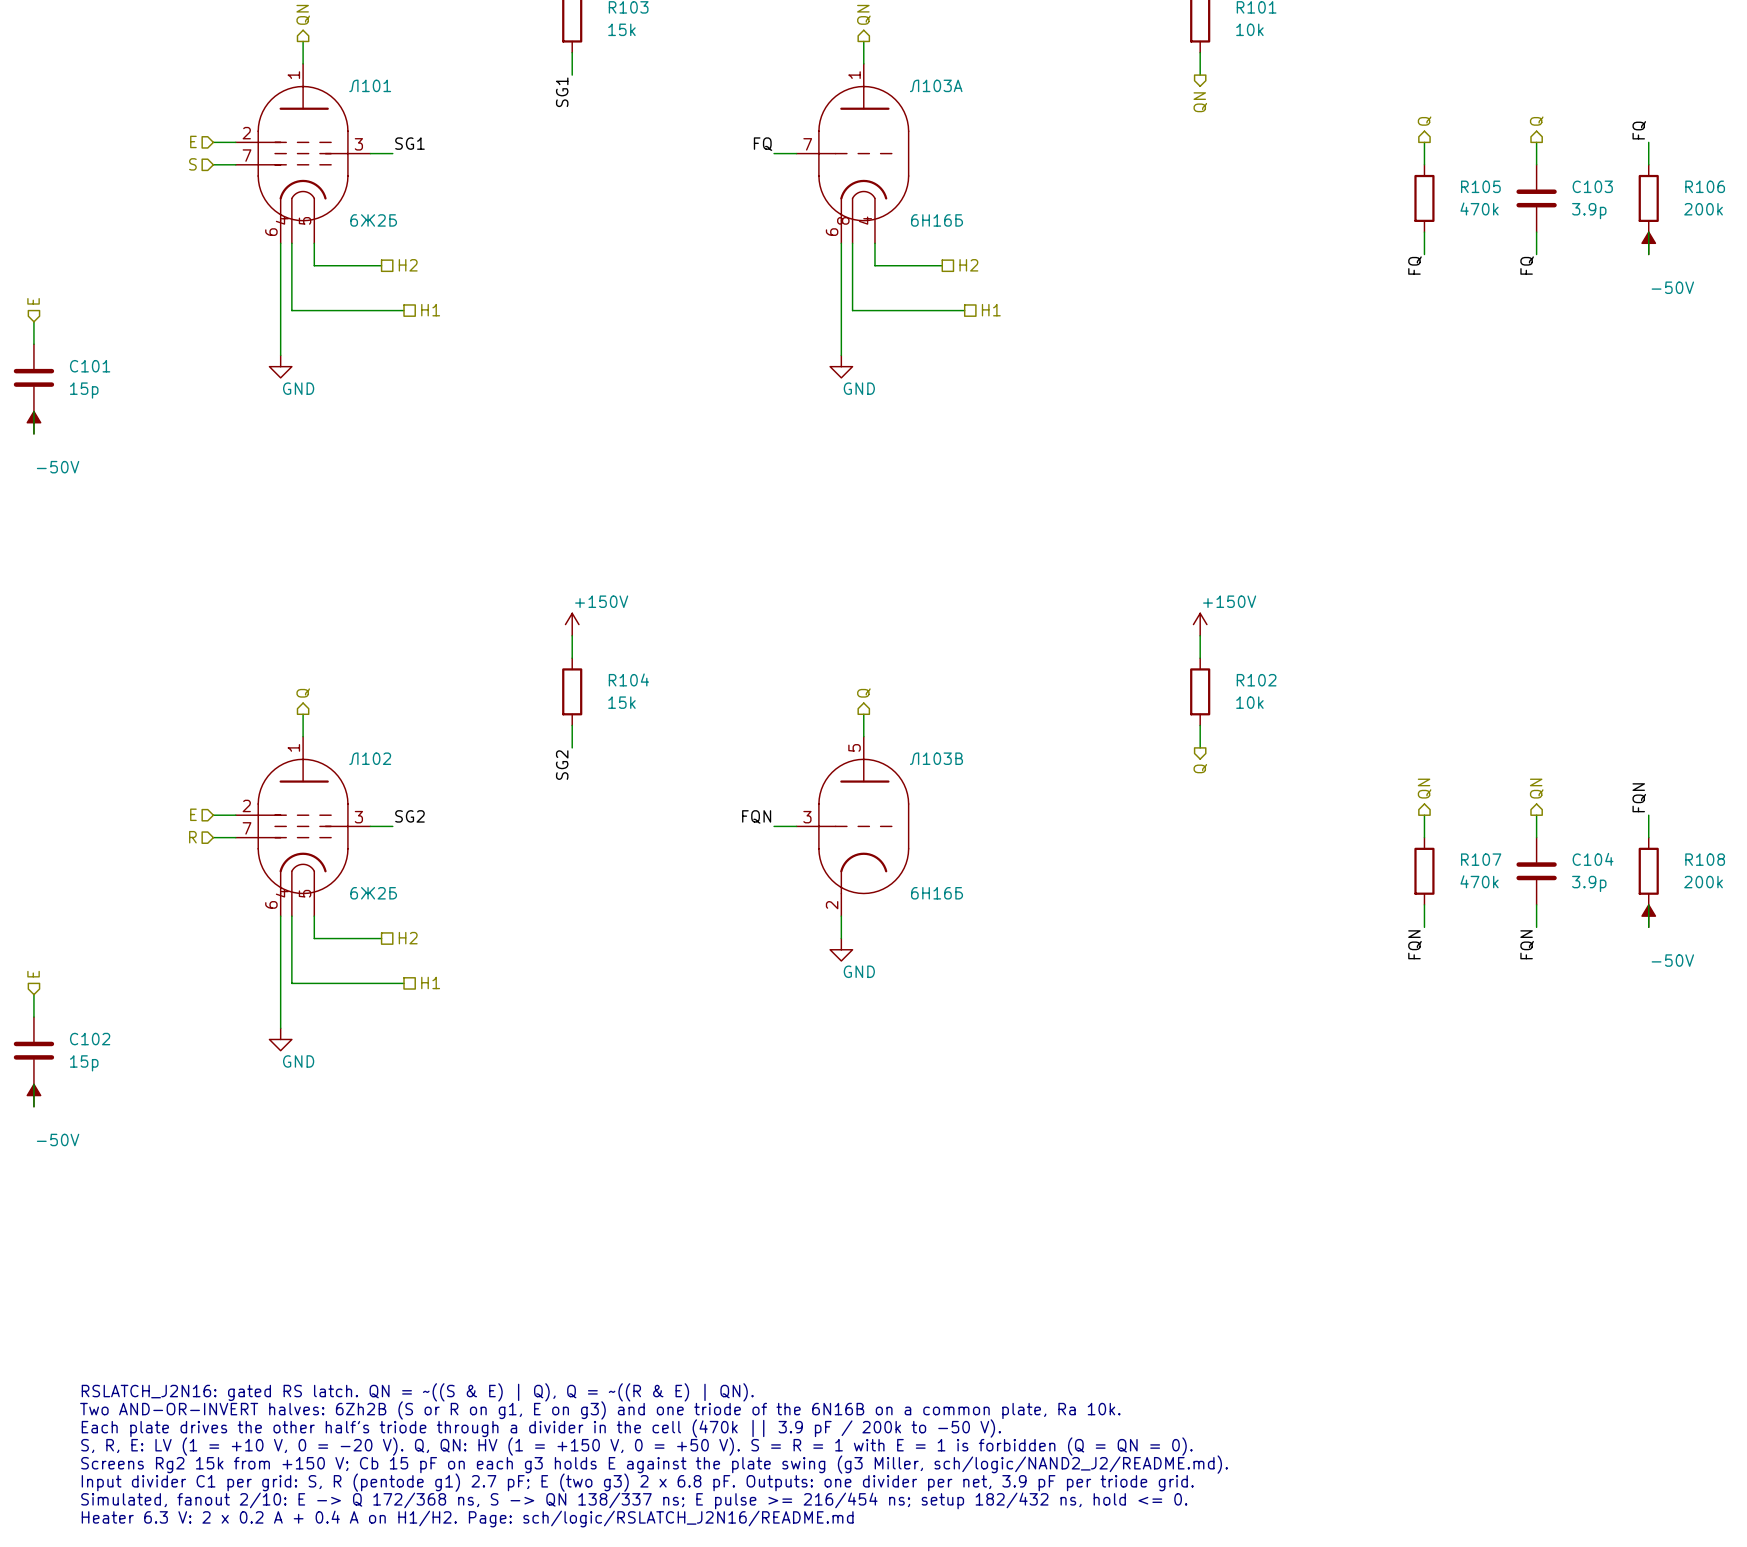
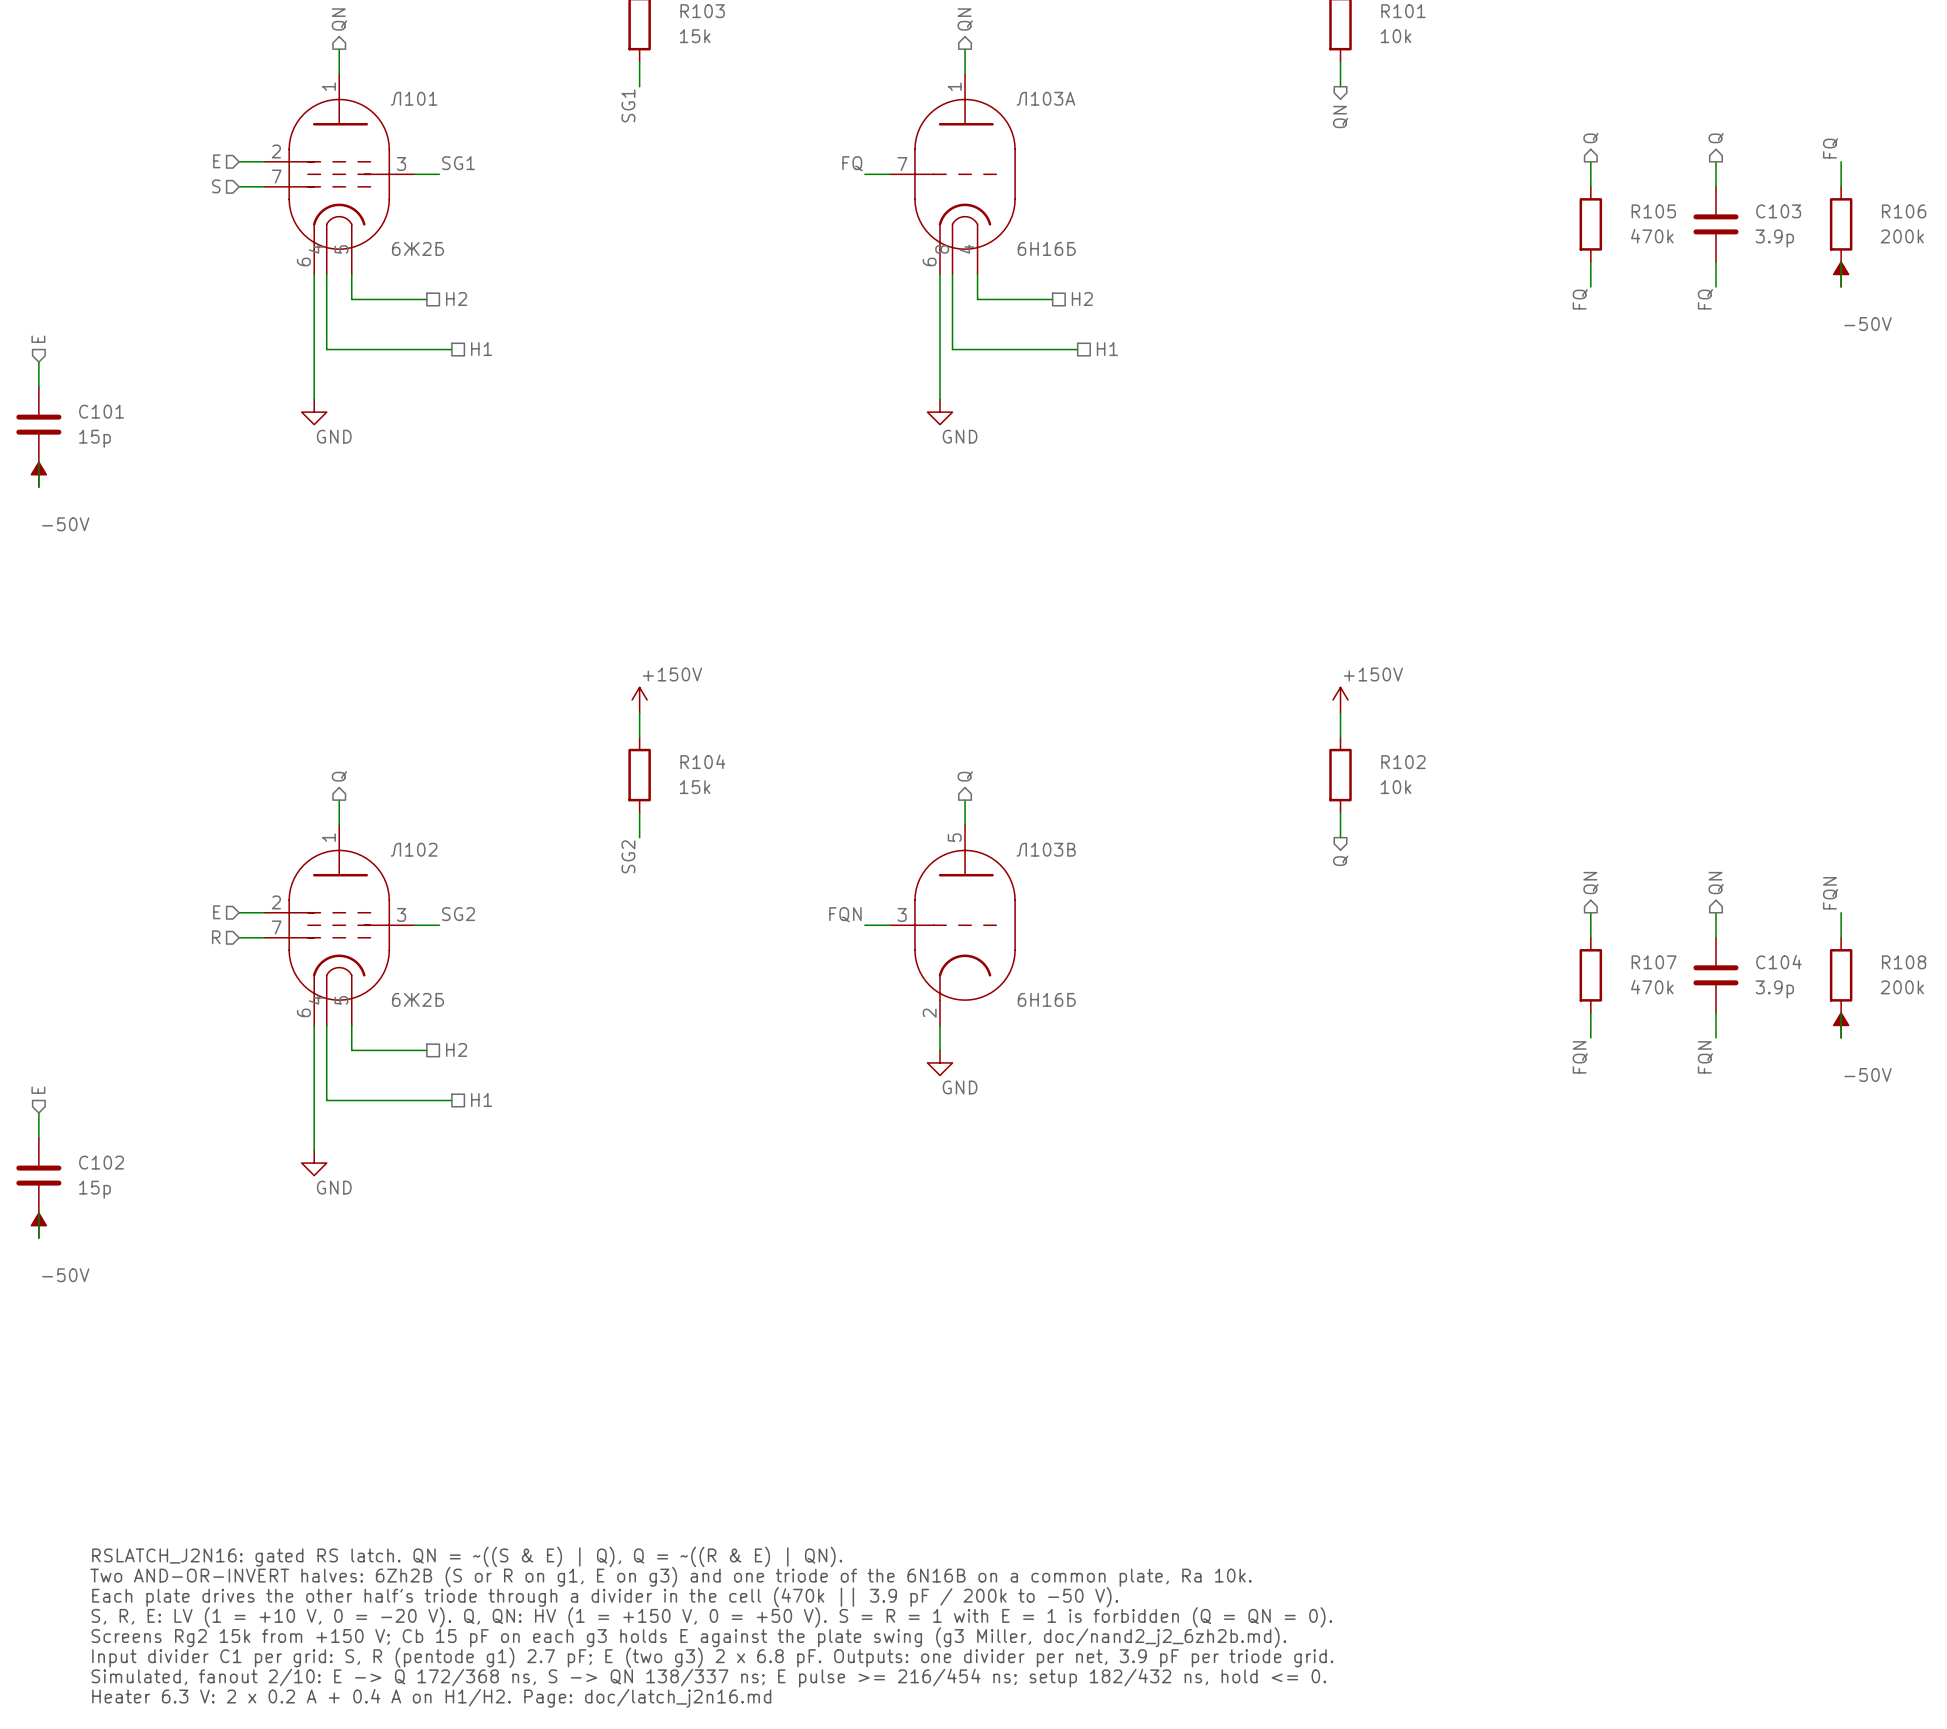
text: Screens Rg2 15k from +150 V; Cb 15 pF on each g3 holds E against the plate swing (g3 Miller, sch/logic/NAND2_J2/README.md). (654, 1464) -> Screens Rg2 15k from +150 V; Cb 15 pF on each g3 holds E against the plate swing (g3 Miller, doc/nand2_j2_6zh2b.md). (688, 1637)
text: Heater 6.3 V: 2 x 0.2 A + 0.4 A on H1/H2. Page: sch/logic/RSLATCH_J2N16/README.md (467, 1519) -> Heater 6.3 V: 2 x 0.2 A + 0.4 A on H1/H2. Page: doc/latch_j2n16.md (431, 1698)

